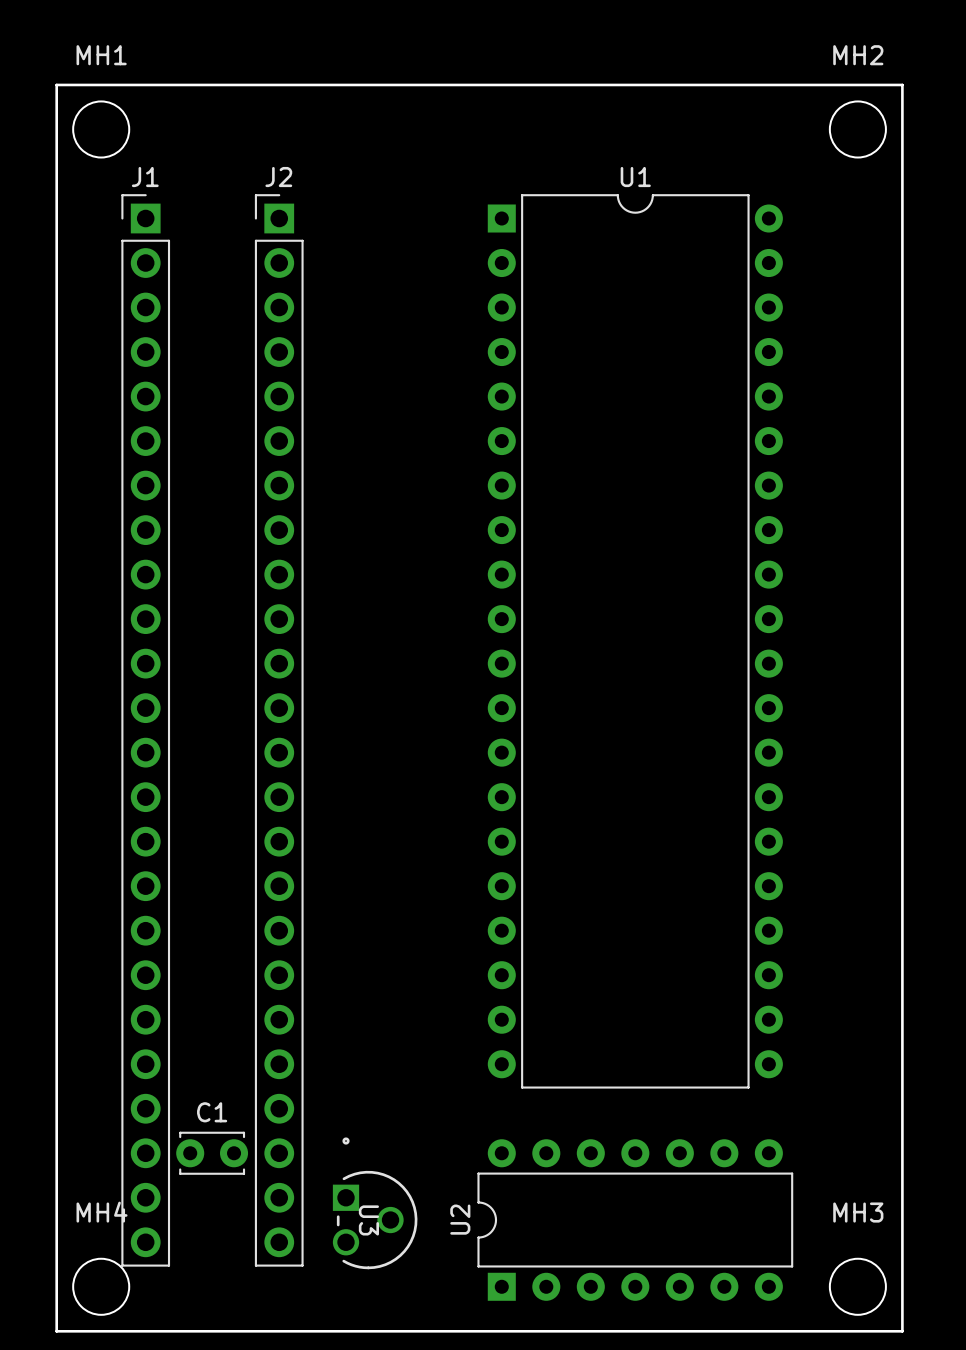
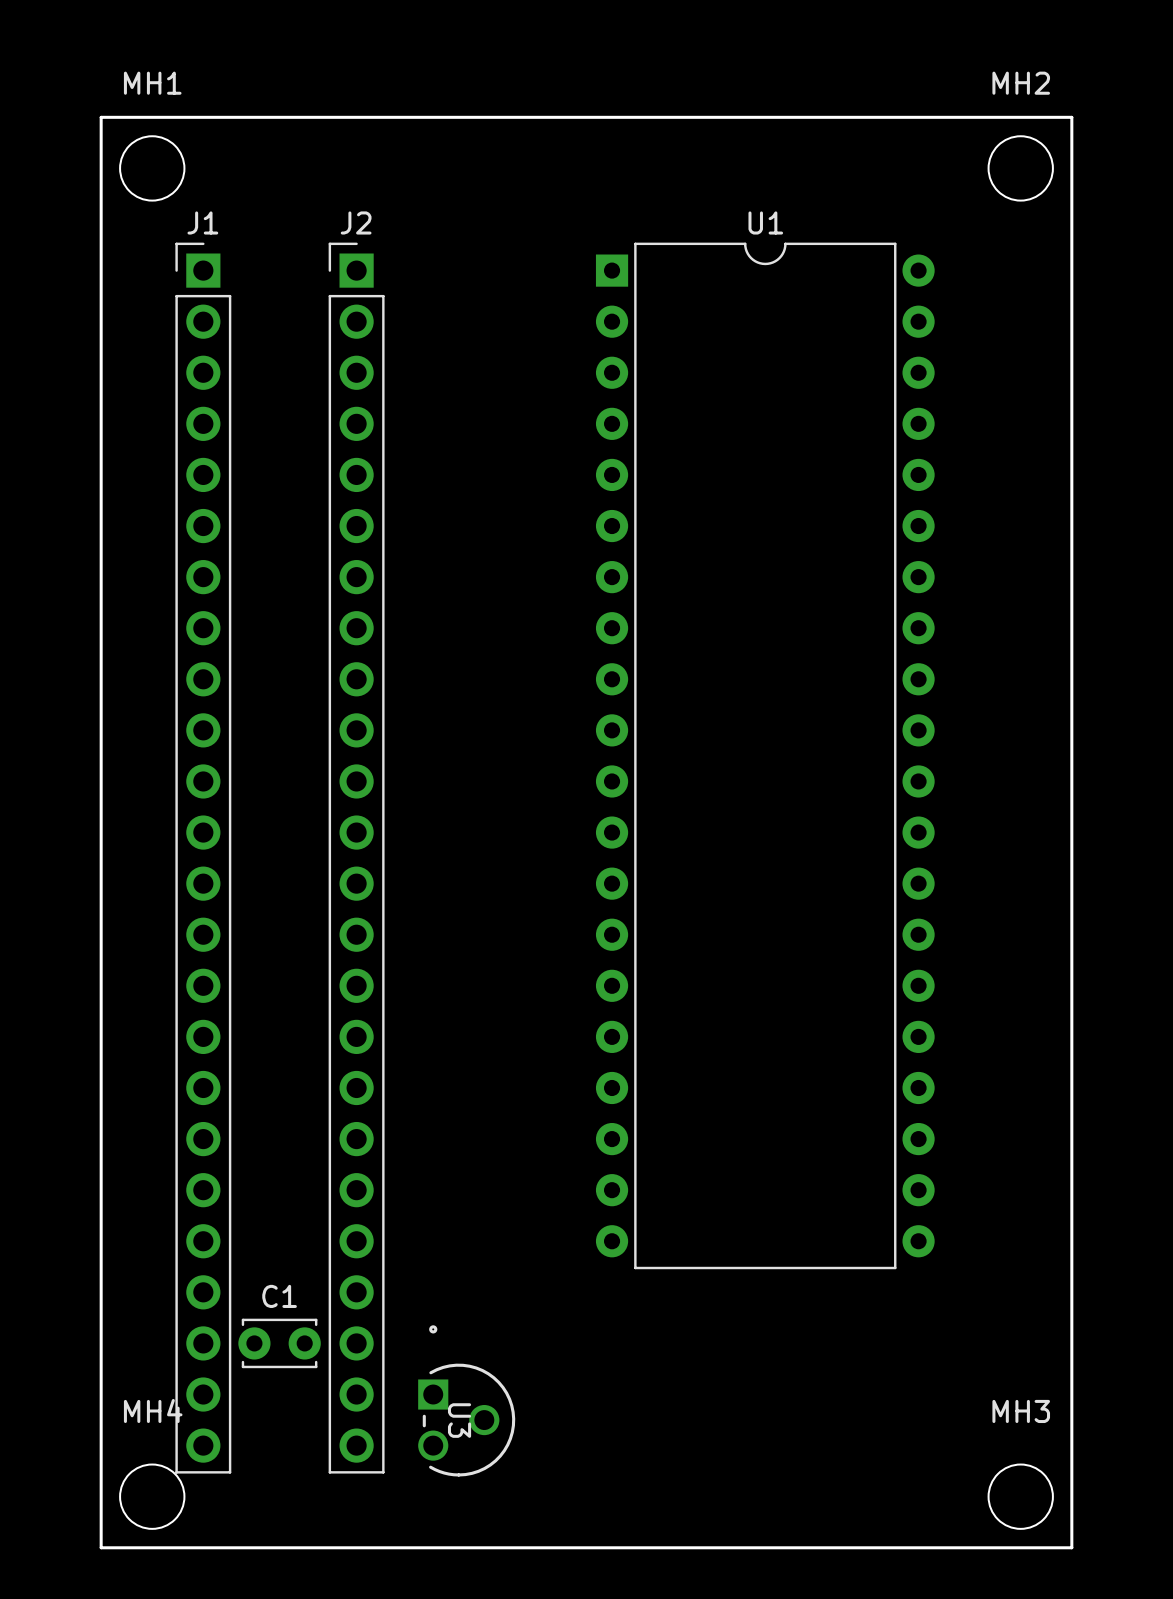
U2: (635, 1220) -> none

